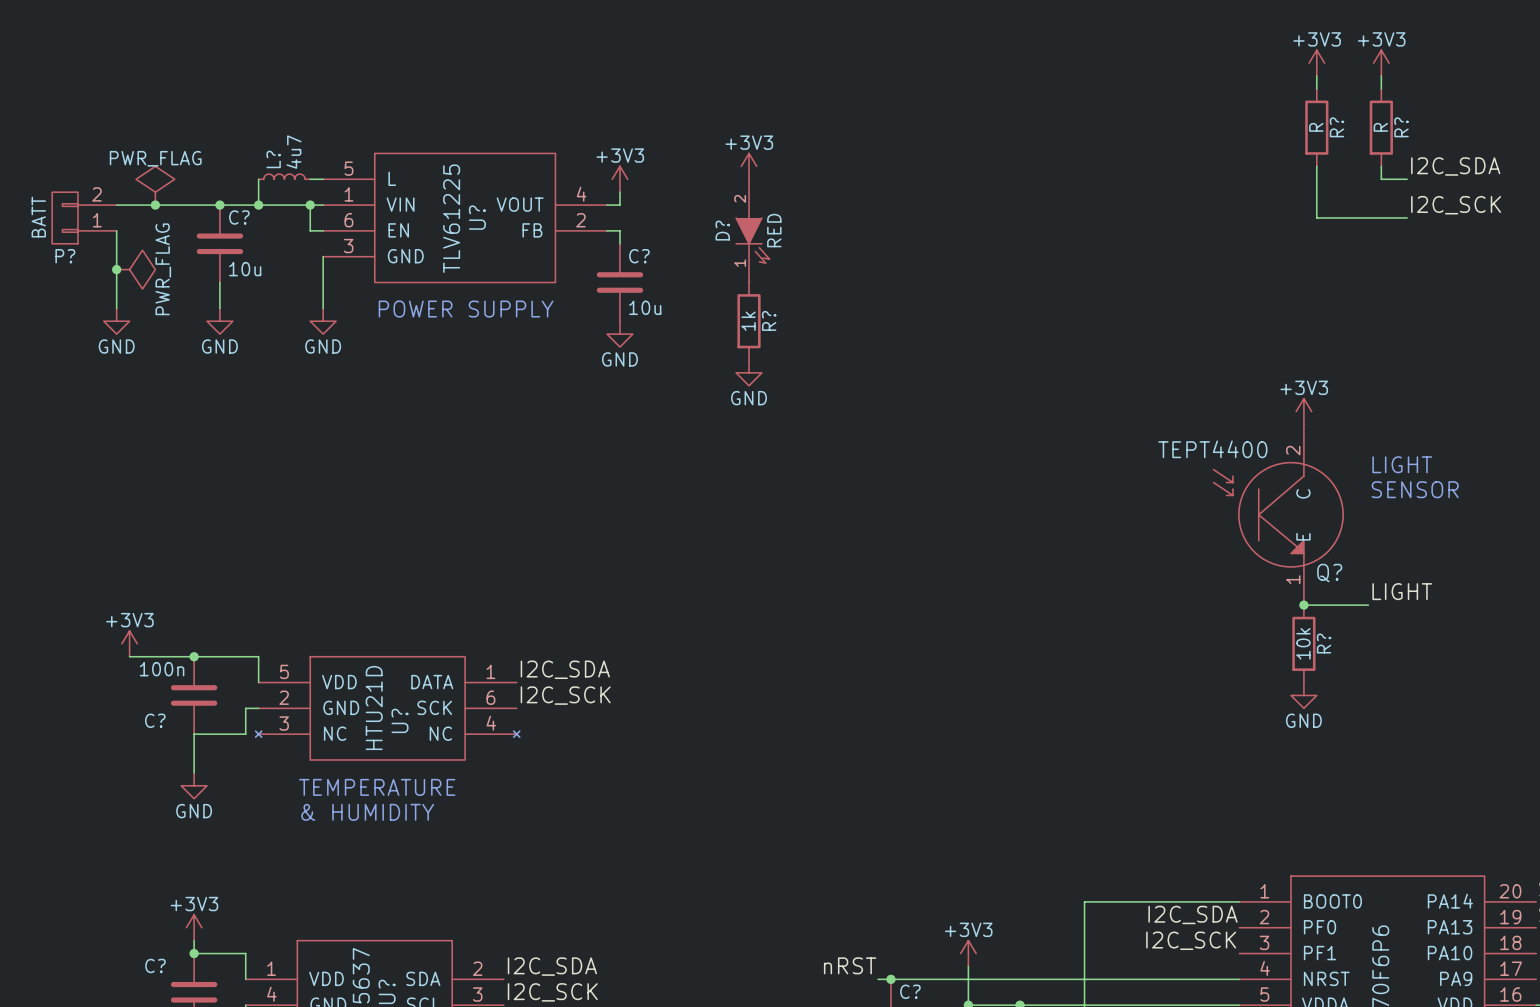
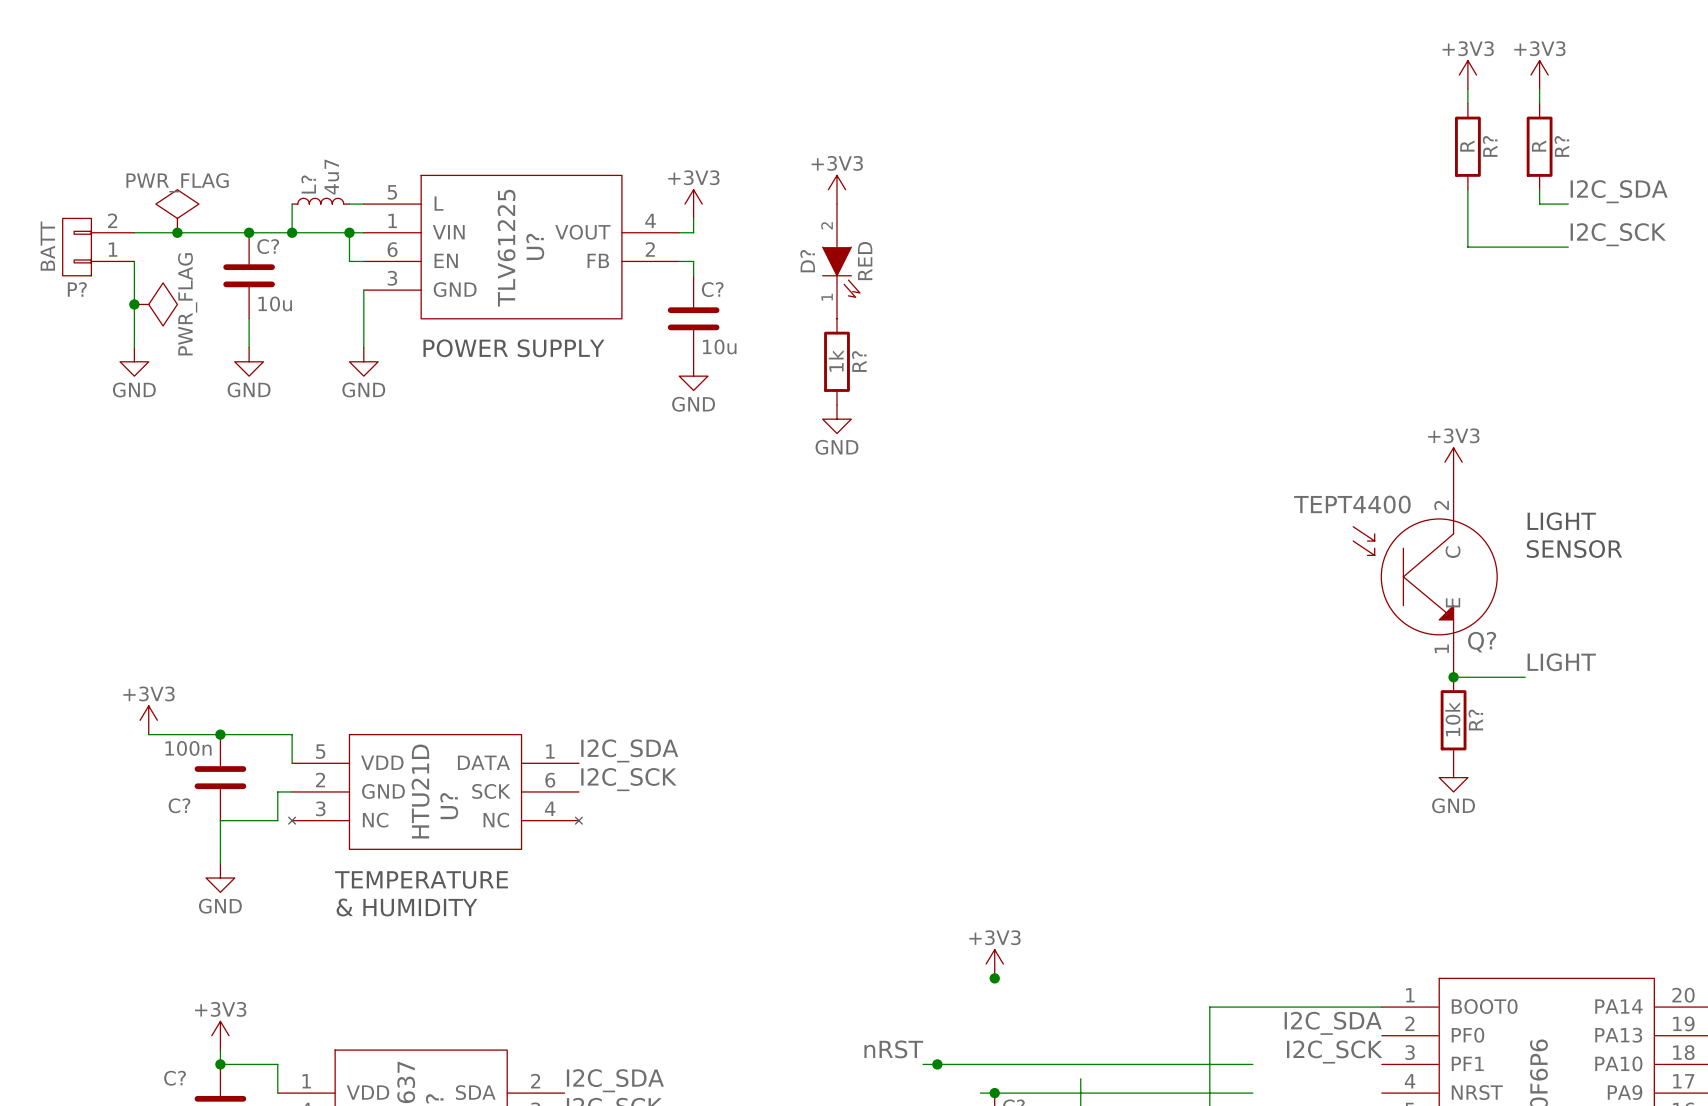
junction: none -> (994, 978)
wire: none -> (923, 1064) (1252, 1064)
junction: none -> (937, 1064)
power symbol position: +3V3 (968, 953) -> +3V3 (994, 964)
label position: nRST (850, 965) -> nRST (893, 1049)
wire: (1123, 979) (1239, 979) -> none

